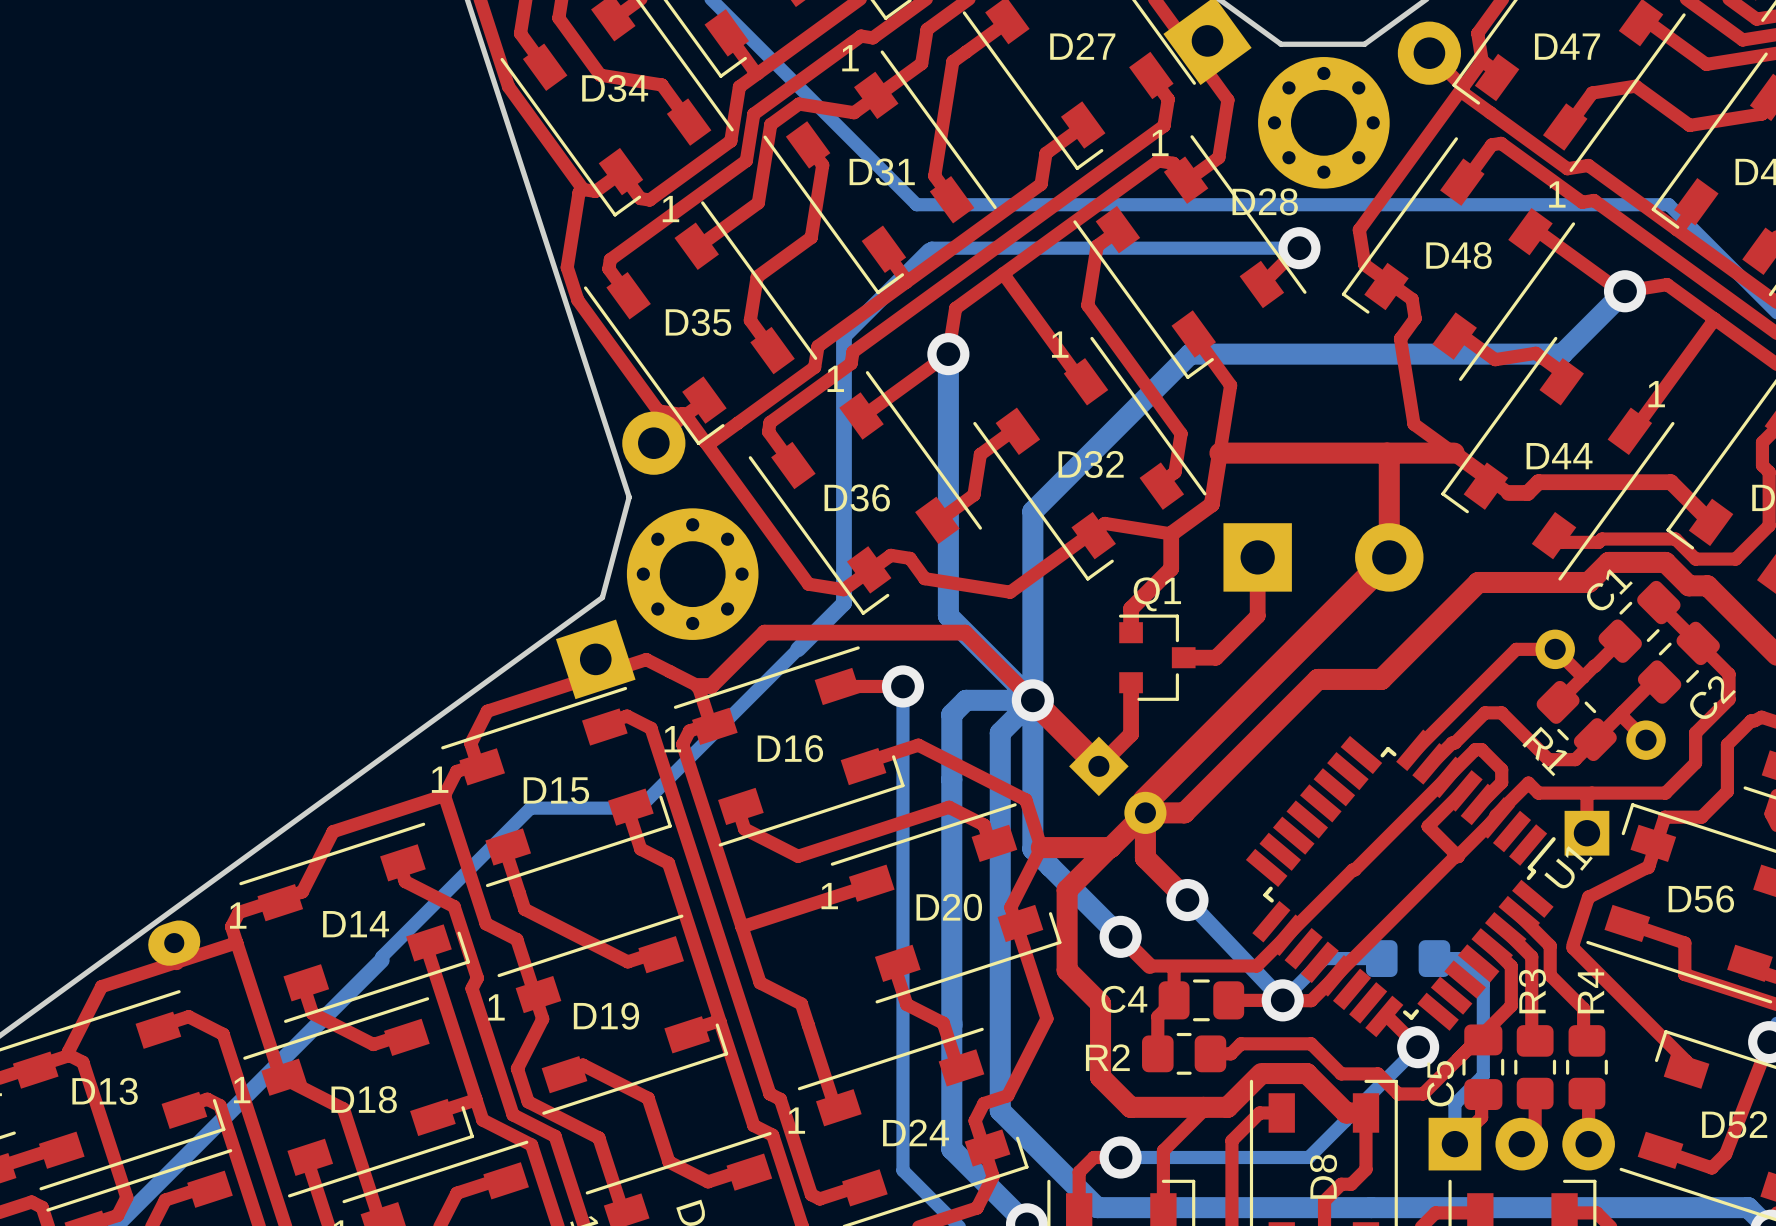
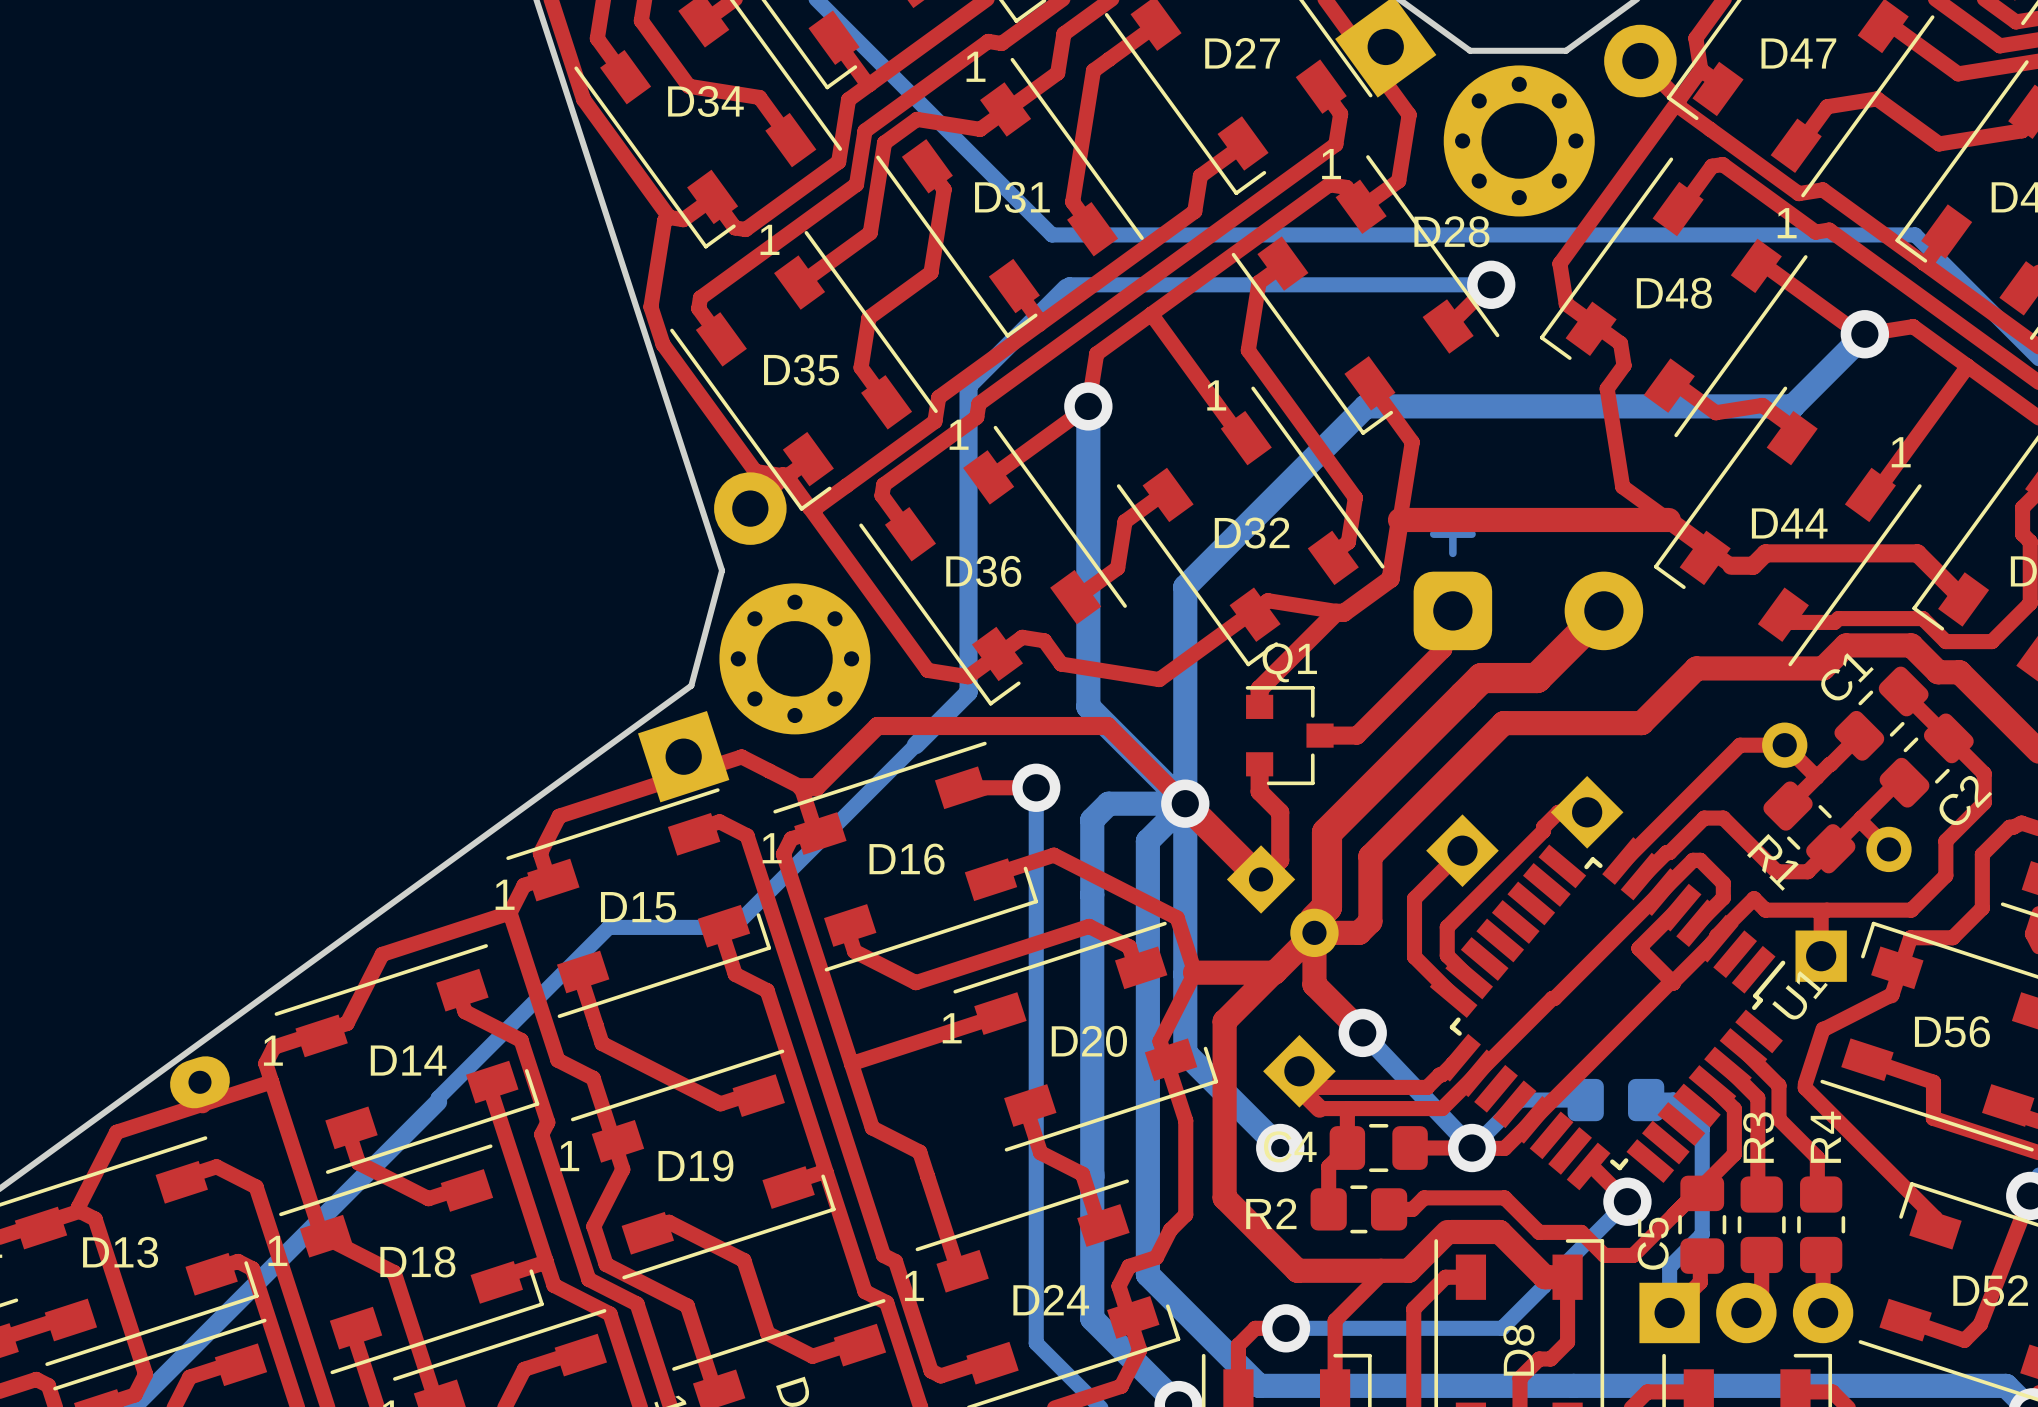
bottom track: none -> (1452, 515) (1452, 553)
top track: (1389, 455) (1389, 557) (1156, 790) -> (1603, 630) (1603, 610) (1536, 678) (1481, 678) (1326, 832) (1326, 907)
bottom track: none -> (1433, 534) (1472, 534)
part: none -> (1528, 610)
top track: (1171, 533) (1171, 568) (1131, 608) (1131, 632) -> (1344, 612) (1335, 612) (1259, 689) (1259, 706)
part: (1323, 557) -> none
top track: (1257, 565) (1257, 615) (1215, 657) (1183, 657) -> (1443, 649) (1356, 735) (1320, 735)
top track: (1430, 630) (1381, 679) (1317, 679) (1194, 803) -> (1641, 723) (1503, 723) (1370, 856) (1370, 921)
Q1 position: (1157, 657) -> (1289, 735)
top track: (1131, 682) (1131, 734) (1115, 749) -> (1259, 764) (1259, 791) (1280, 812) (1280, 860)
top track: none -> (1587, 812) (1558, 812) (1543, 827) (1543, 830) (1447, 927) (1447, 955) (1469, 977)
part: none -> (1587, 812)
top track: none -> (1462, 850) (1414, 898) (1414, 956) (1453, 996)
part: none -> (1462, 850)
bottom track: (1032, 849) (1120, 936) -> (1185, 974) (1185, 1053) (1280, 1148)
top track: none -> (1459, 1057) (1427, 1087) (1315, 1087) (1299, 1071)
part: none -> (1299, 1071)
via: (1120, 936) -> none
top track: (1067, 970) (1100, 1003) (1100, 1077) -> (1224, 1113) (1224, 1197) (1262, 1236)
top track: (1033, 976) (1046, 1018) (1019, 1071) -> (1185, 1120) (1185, 1214) (1170, 1230)
via: none -> (1280, 1148)

